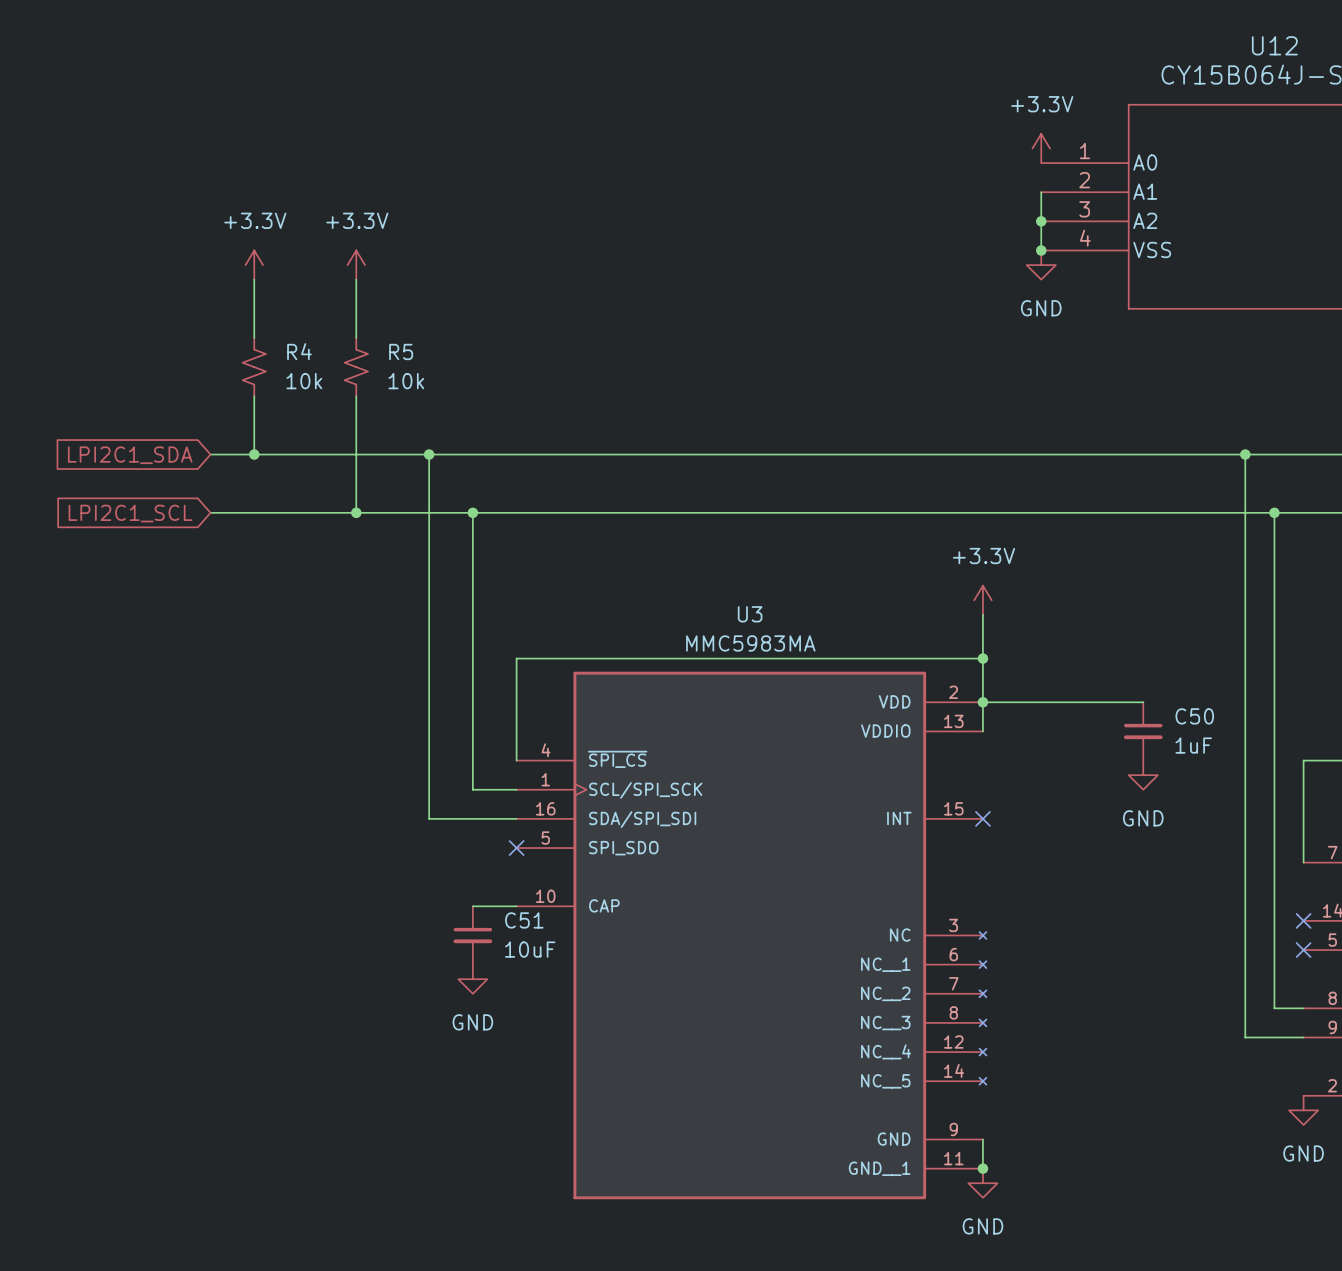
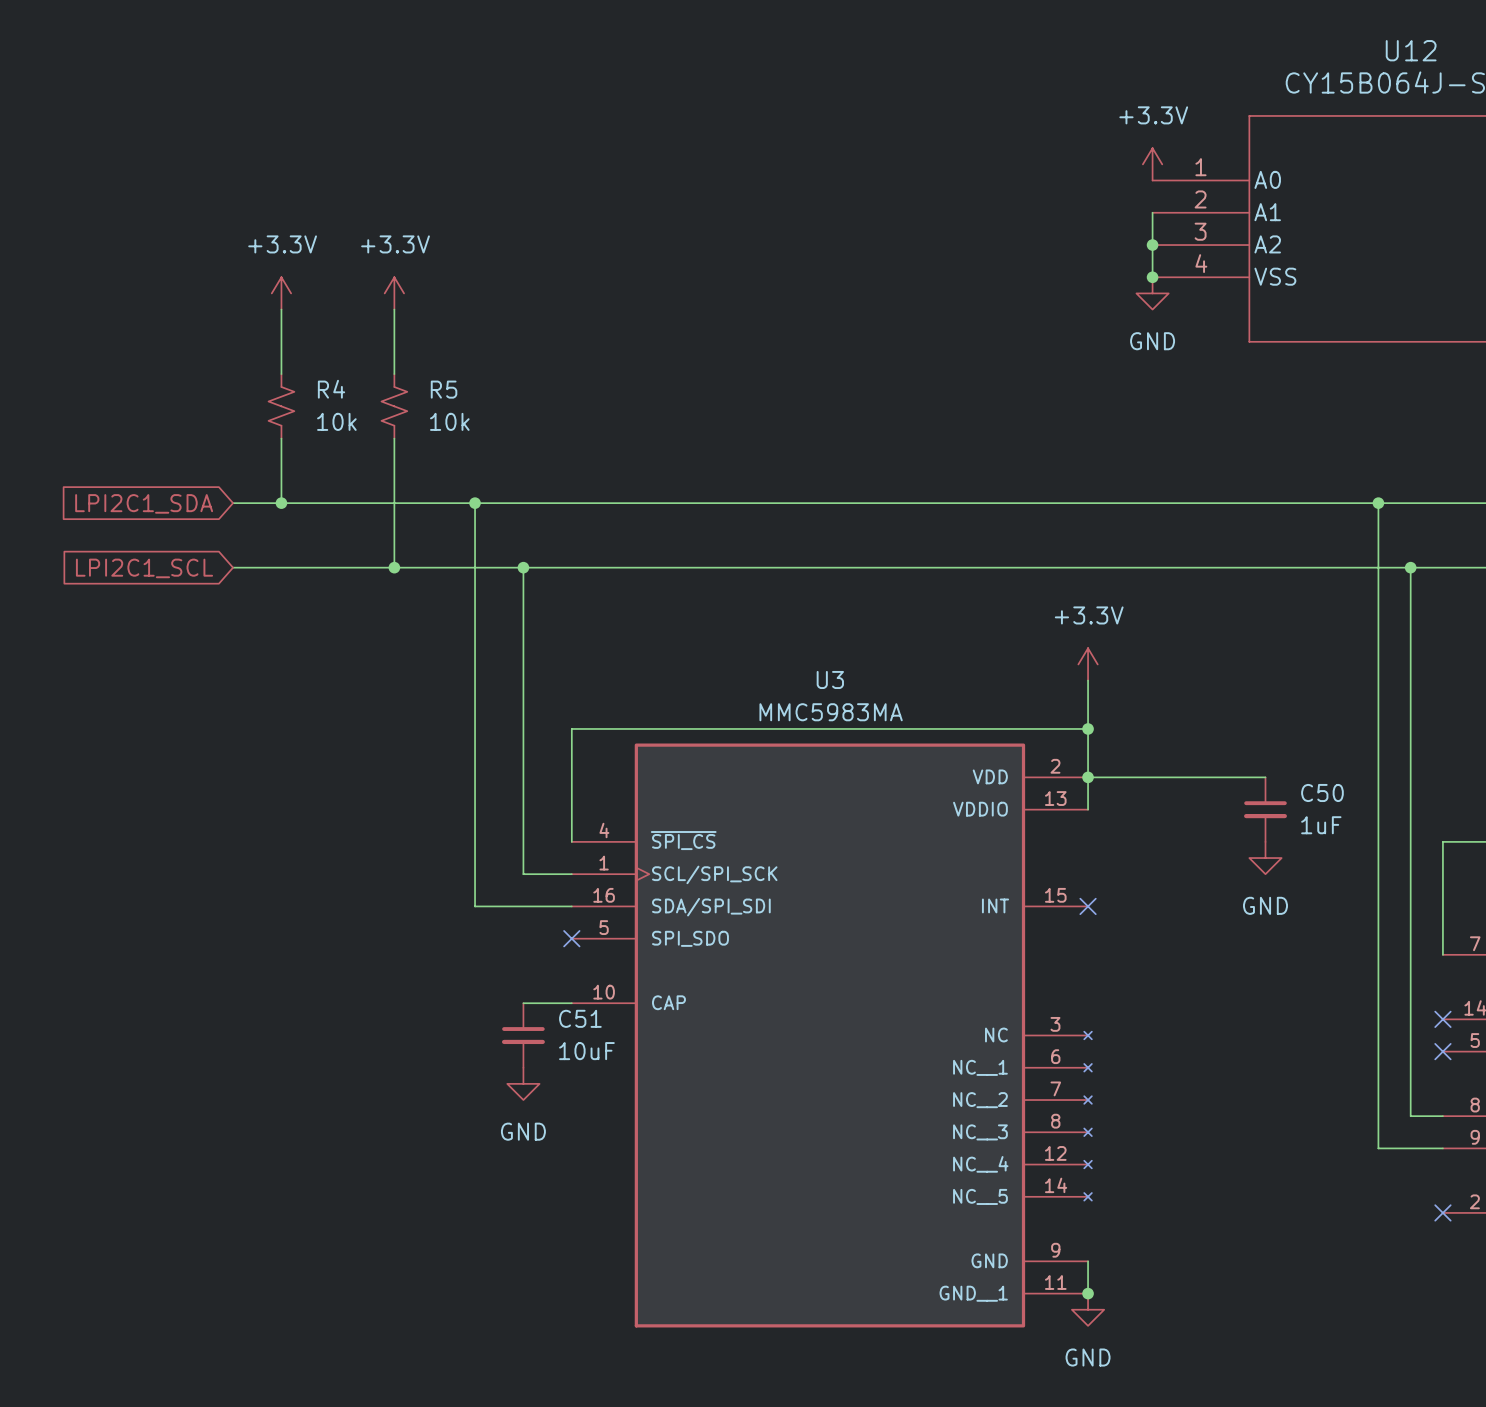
no-connect mark: none -> (1442, 1212)
power symbol: GND (1303, 1110) -> none

